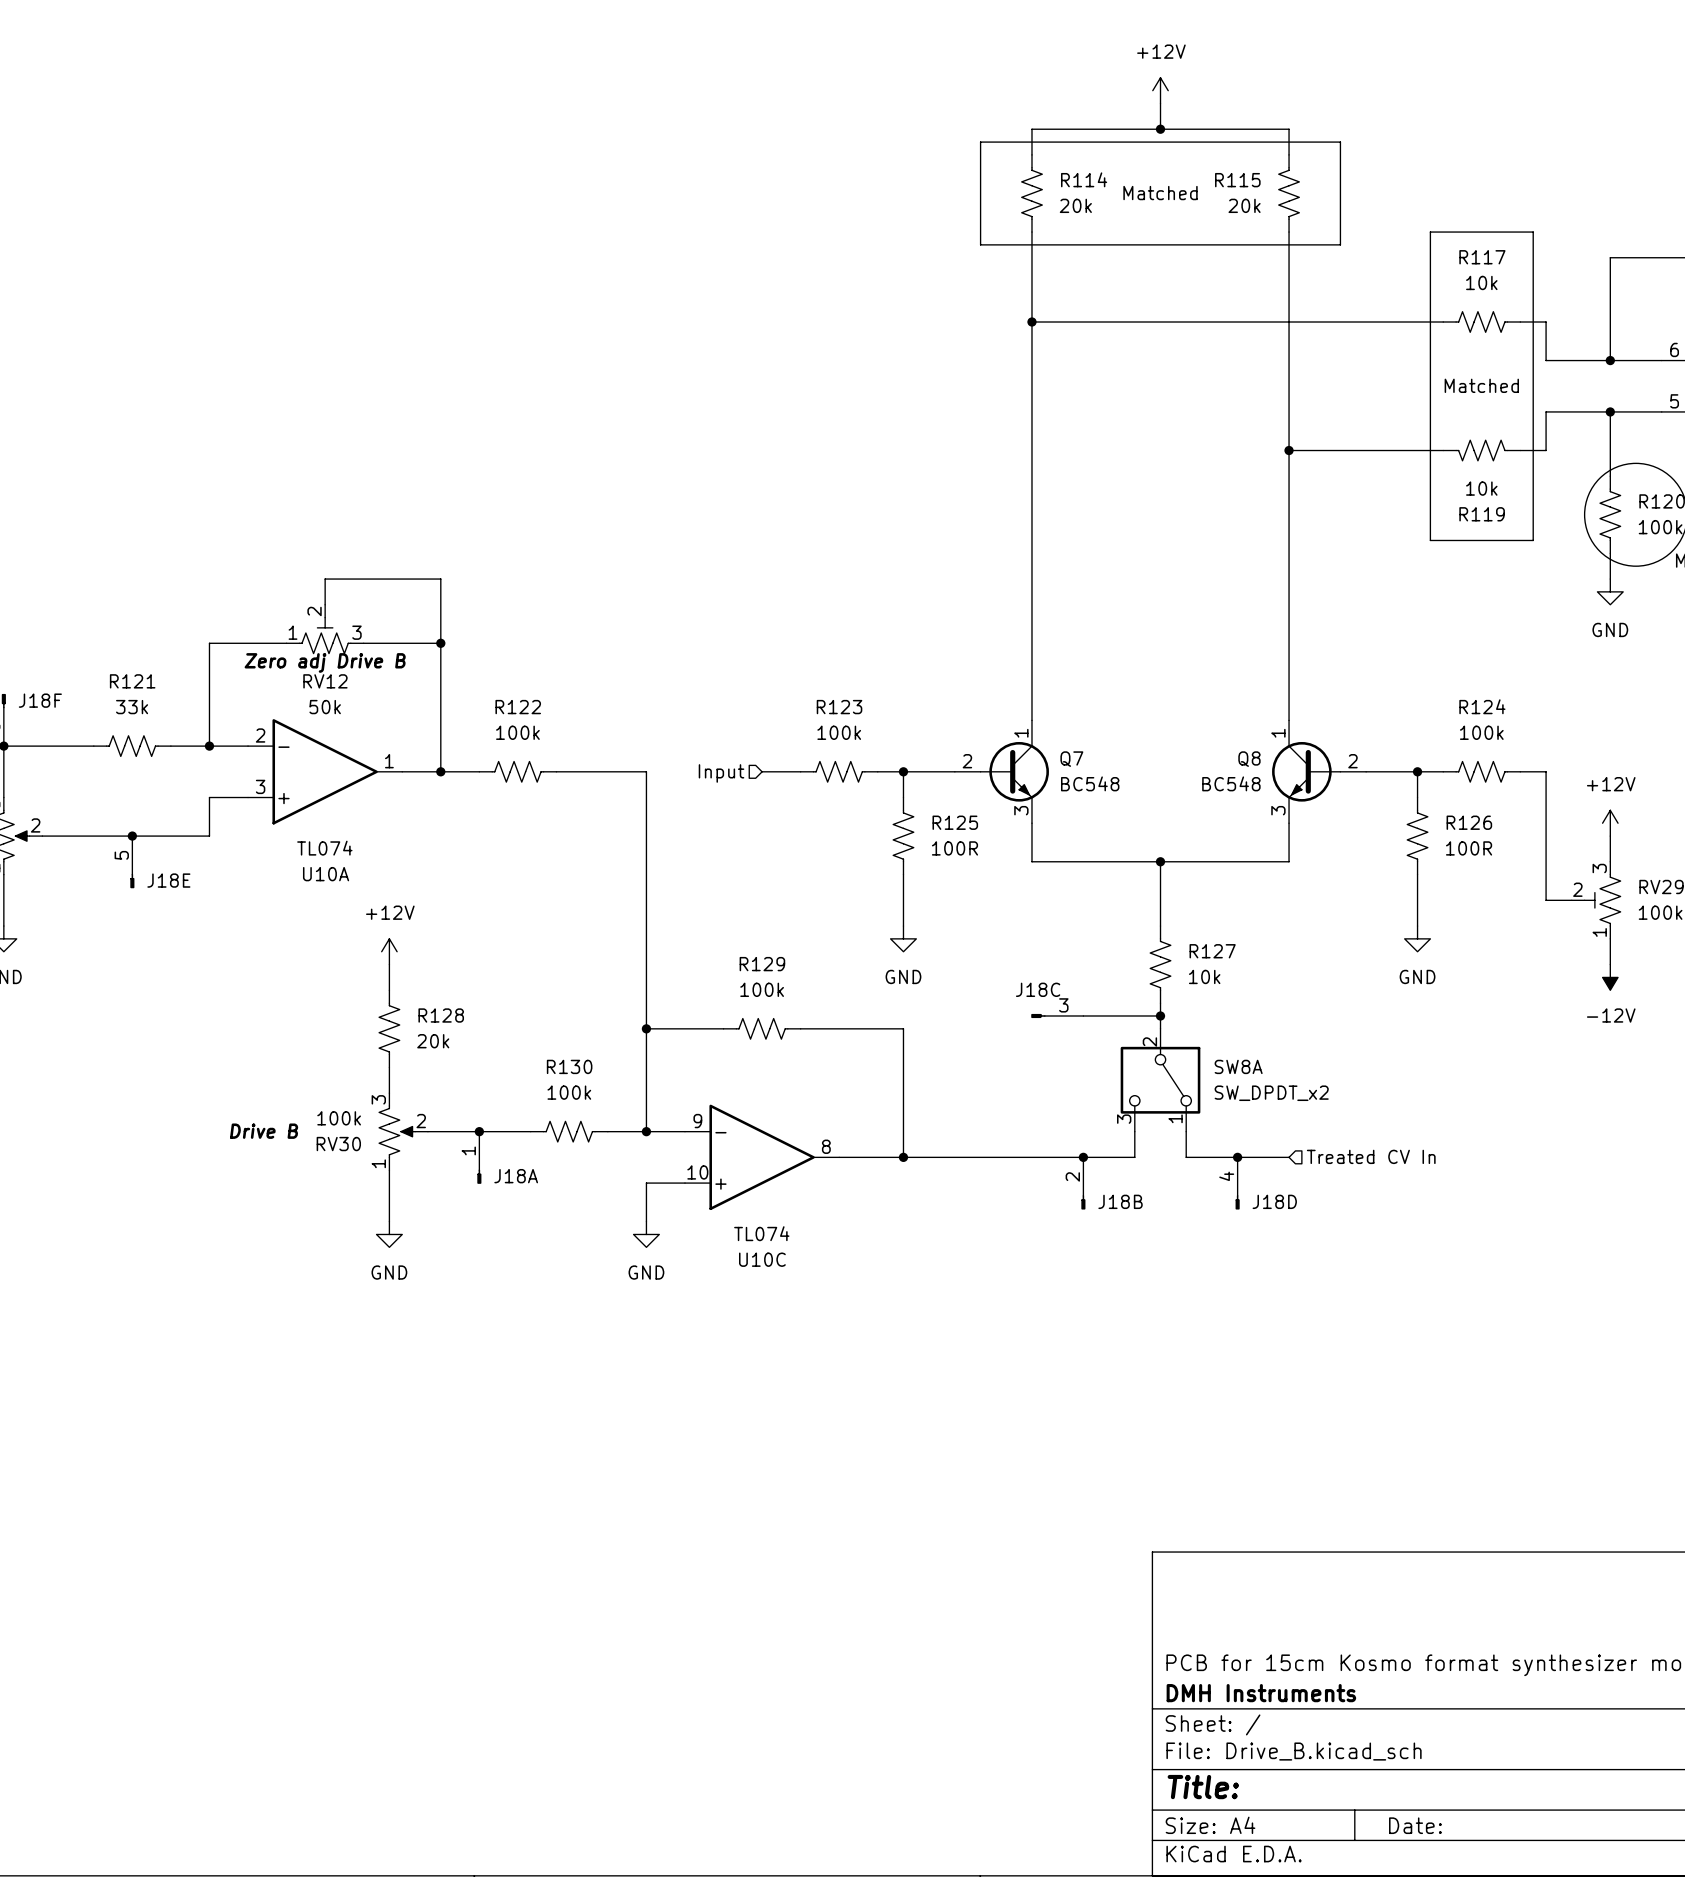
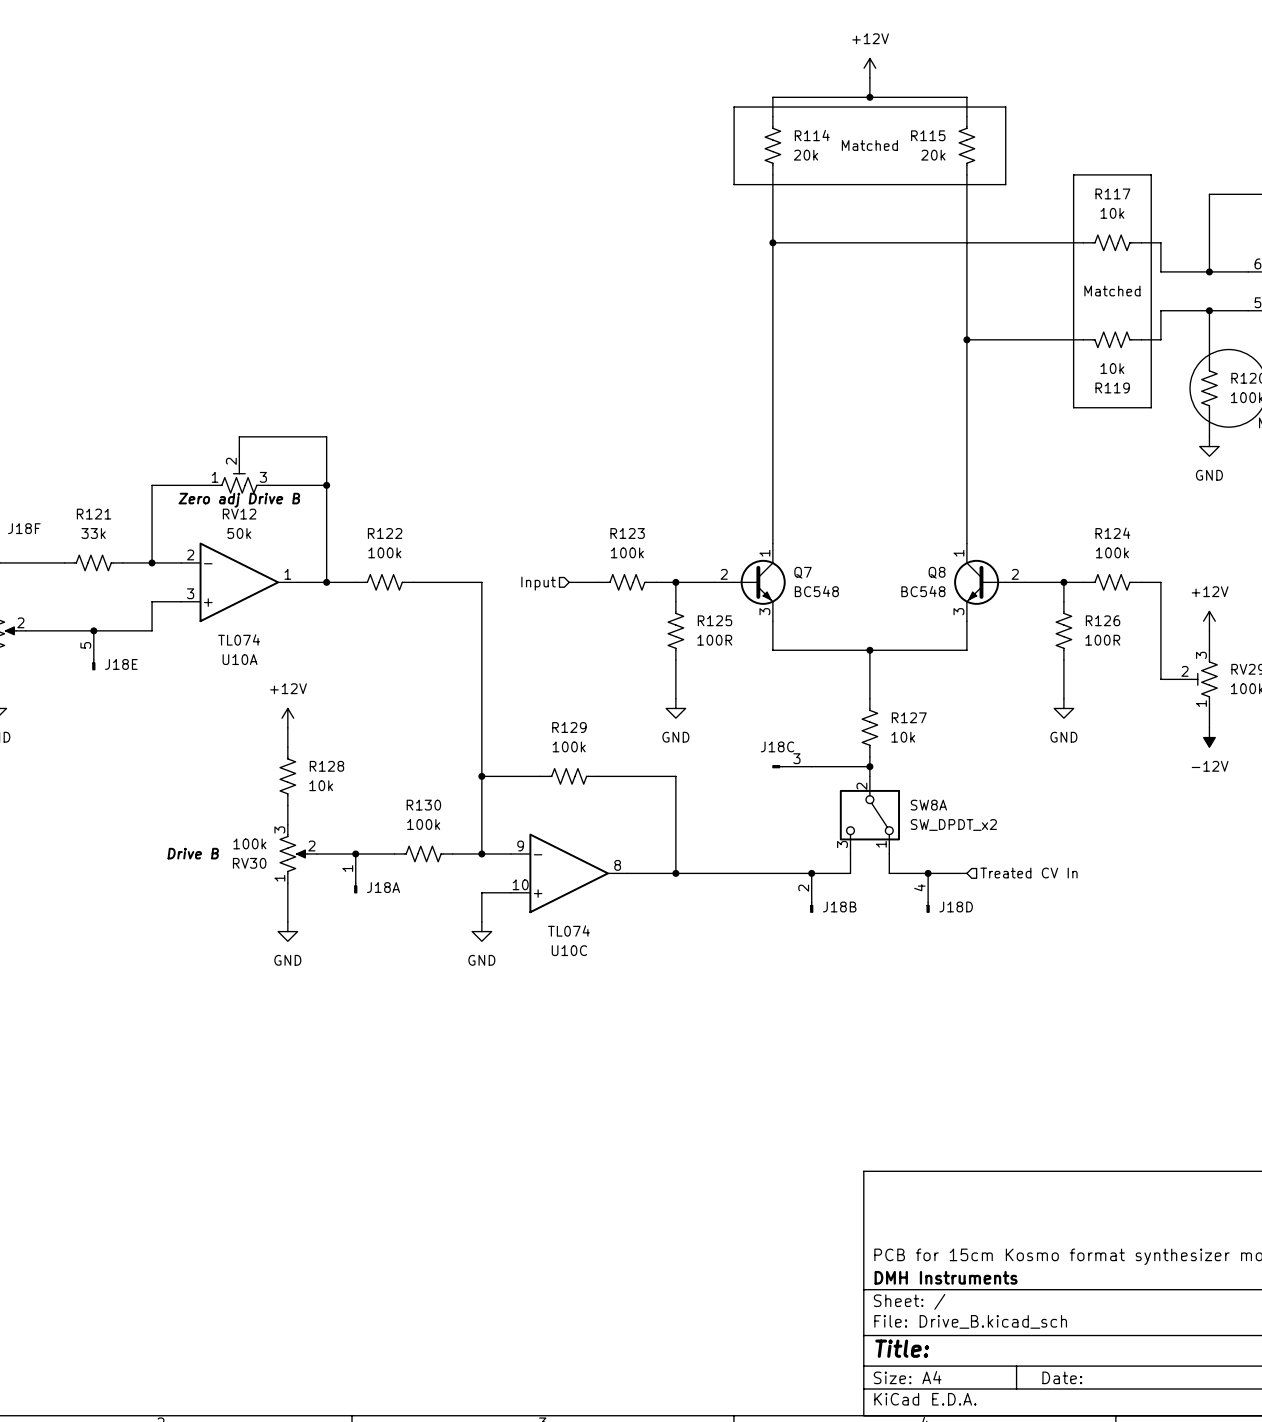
R128 value: 20k (433, 1041) -> 10k (321, 785)

